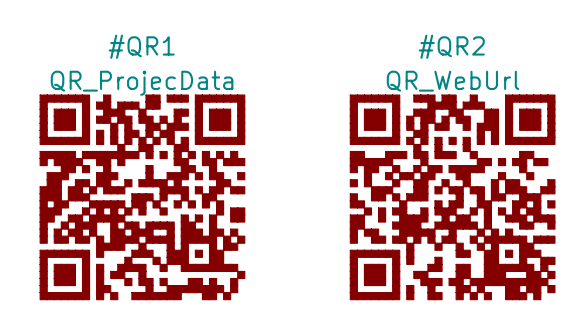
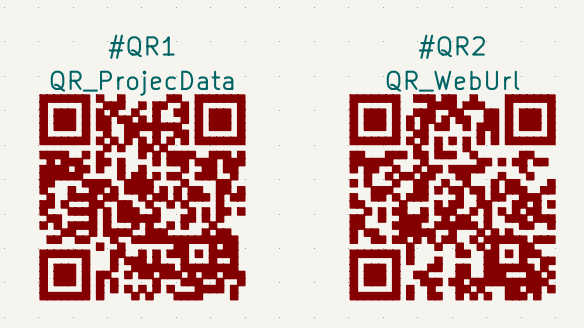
#QR1 shape: [40, 95, 245, 300] -> [40, 95, 245, 300]

